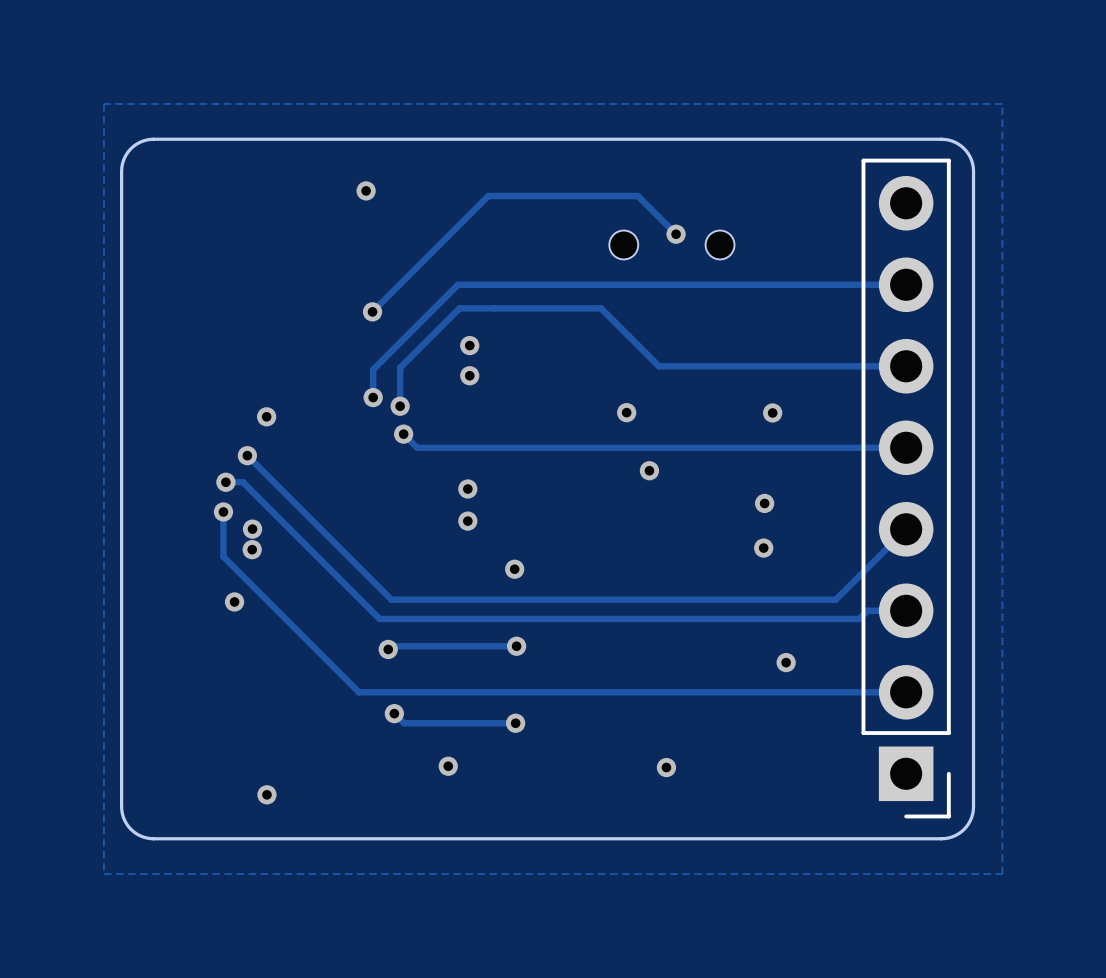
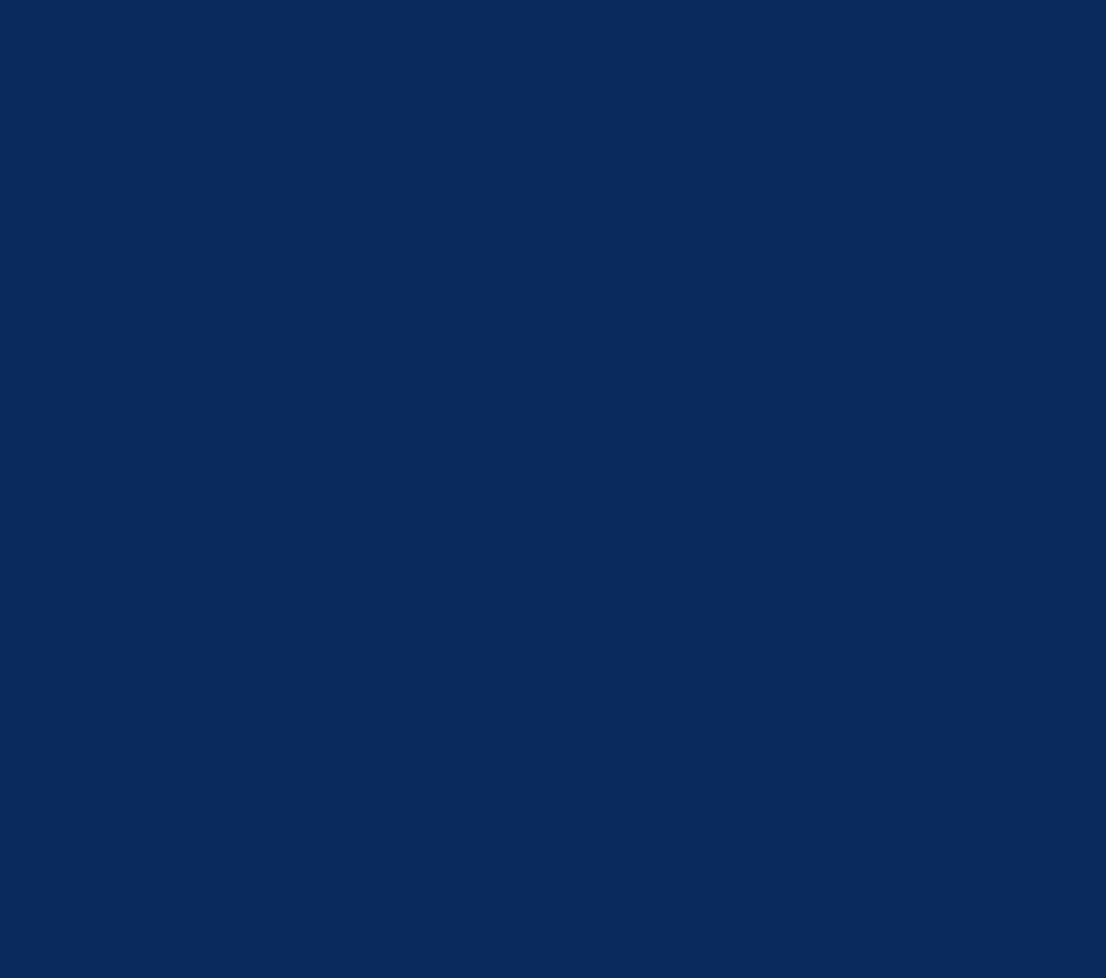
zone outline: (1002, 103) (103, 103) (103, 874) (1002, 874) (1002, 103) -> none
board edge: (941, 139) (153, 139) (143, 141) (133, 146) (124, 157) (121, 171) (121, 806) (123, 817) (128, 826) (139, 835) (153, 838) (941, 838) (952, 836) (961, 831) (970, 820) (973, 806) (973, 171) (970, 157) (964, 148) (955, 142) (941, 139) -> none
via: (366, 190) -> none
track: (676, 234) (637, 196) (488, 196) (372, 311) -> none
via: (676, 234) -> none
part: (671, 244) -> none
track: (906, 284) (458, 284) (373, 369) (373, 397) -> none
via: (372, 311) -> none
via: (469, 345) -> none
track: (906, 366) (658, 366) (601, 308) (459, 308) (400, 367) (400, 406) -> none
via: (469, 375) -> none
via: (373, 397) -> none
via: (400, 406) -> none
via: (626, 412) -> none
via: (772, 412) -> none
via: (266, 416) -> none
track: (403, 434) (417, 447) (906, 447) -> none
via: (403, 434) -> none
track: (247, 455) (391, 599) (835, 599) (906, 529) -> none
via: (247, 455) -> none
via: (649, 470) -> none
track: (225, 482) (242, 482) (379, 618) (859, 618) (867, 610) (906, 610) -> none
via: (225, 482) -> none
part: (906, 488) -> none
via: (467, 489) -> none
via: (764, 503) -> none
track: (223, 511) (223, 556) (358, 692) (906, 692) -> none
via: (223, 511) -> none
via: (467, 521) -> none
via: (252, 529) -> none
via: (763, 548) -> none
via: (252, 549) -> none
via: (514, 569) -> none
via: (234, 601) -> none
track: (516, 646) (391, 646) (388, 649) -> none
via: (516, 646) -> none
via: (388, 649) -> none
via: (786, 662) -> none
track: (394, 713) (403, 723) (515, 723) -> none
via: (394, 713) -> none
via: (515, 723) -> none
via: (448, 766) -> none
via: (666, 767) -> none
via: (266, 794) -> none

